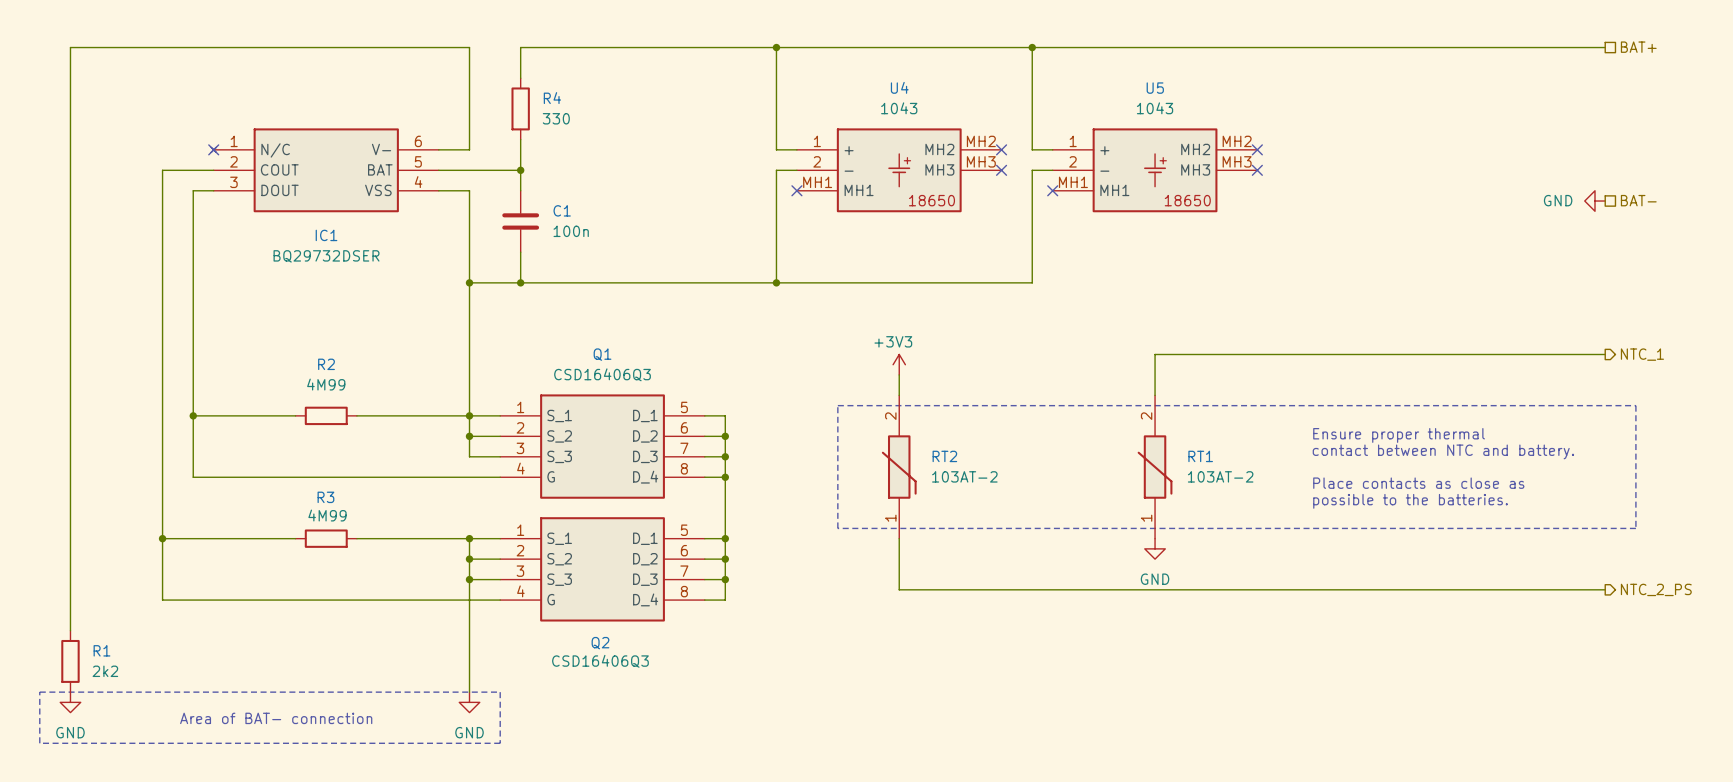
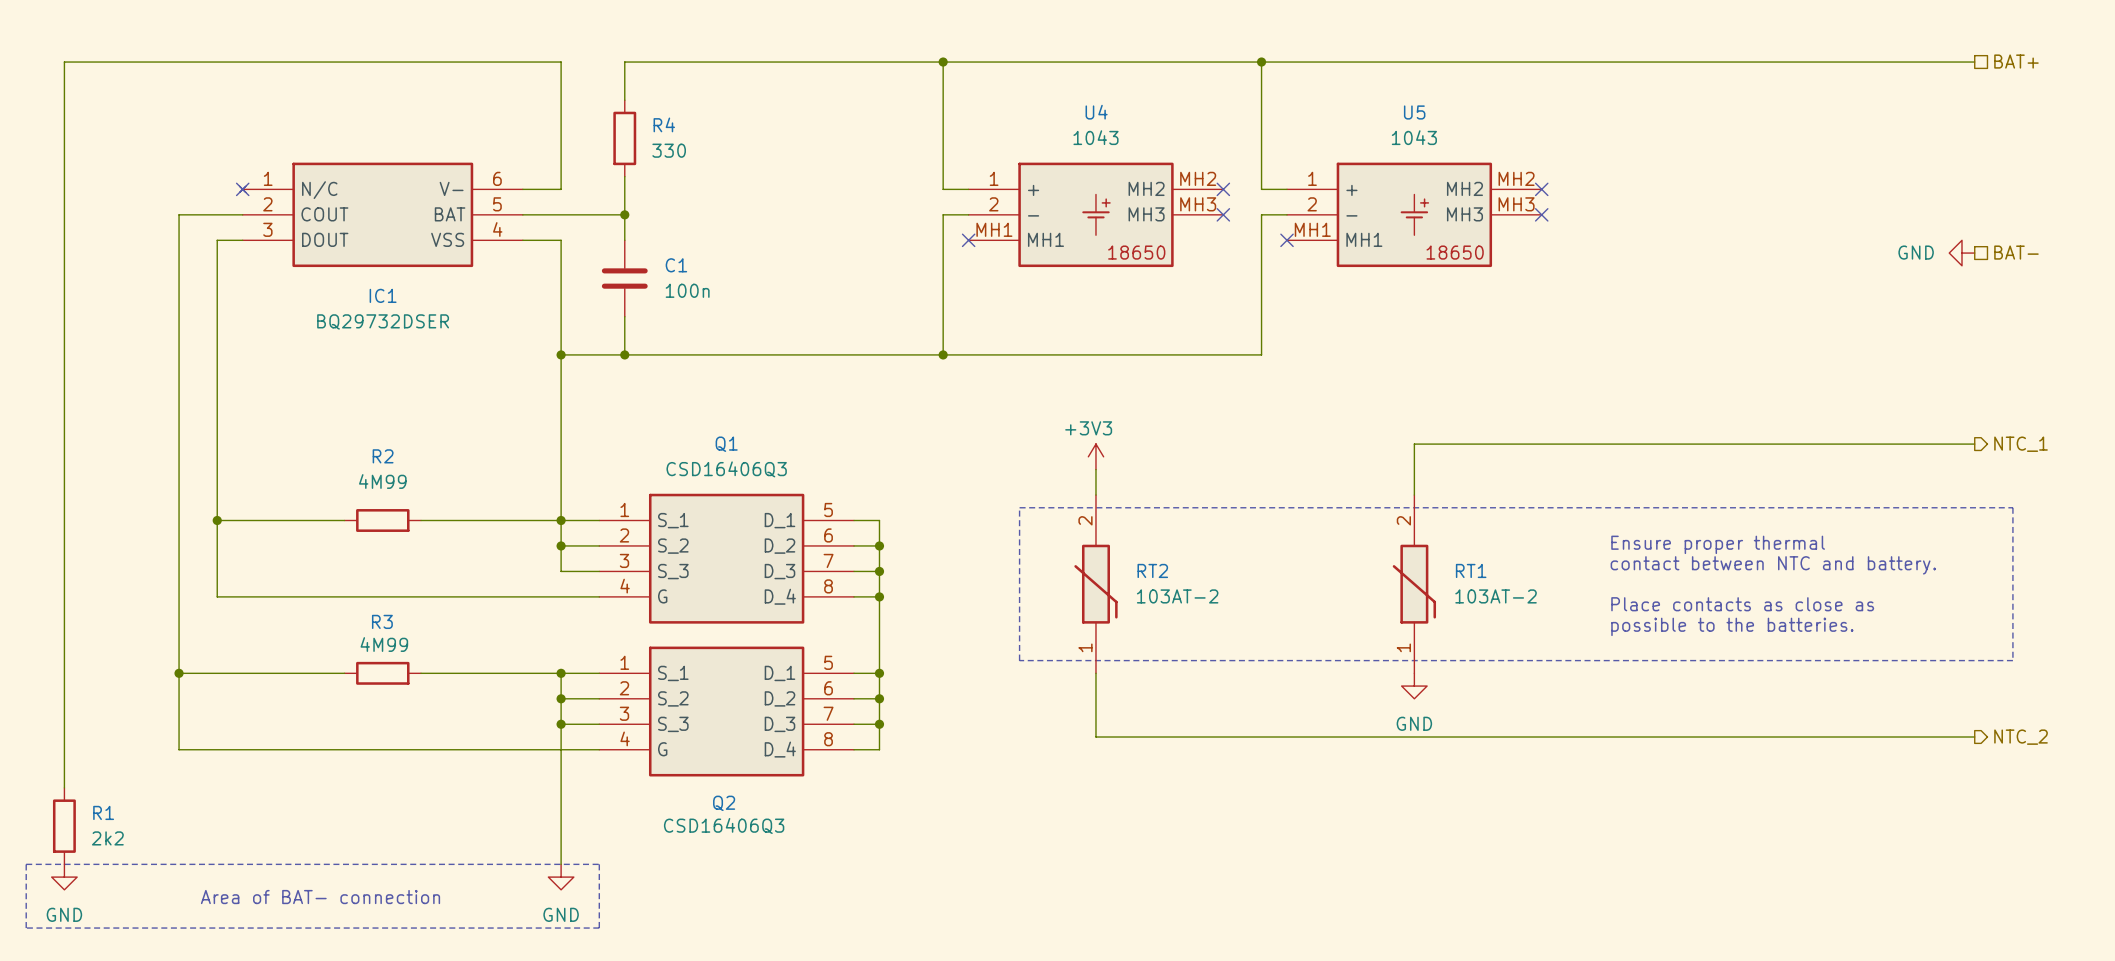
hierarchical label: NTC_2_PS (1656, 589) -> NTC_2 (2021, 737)

